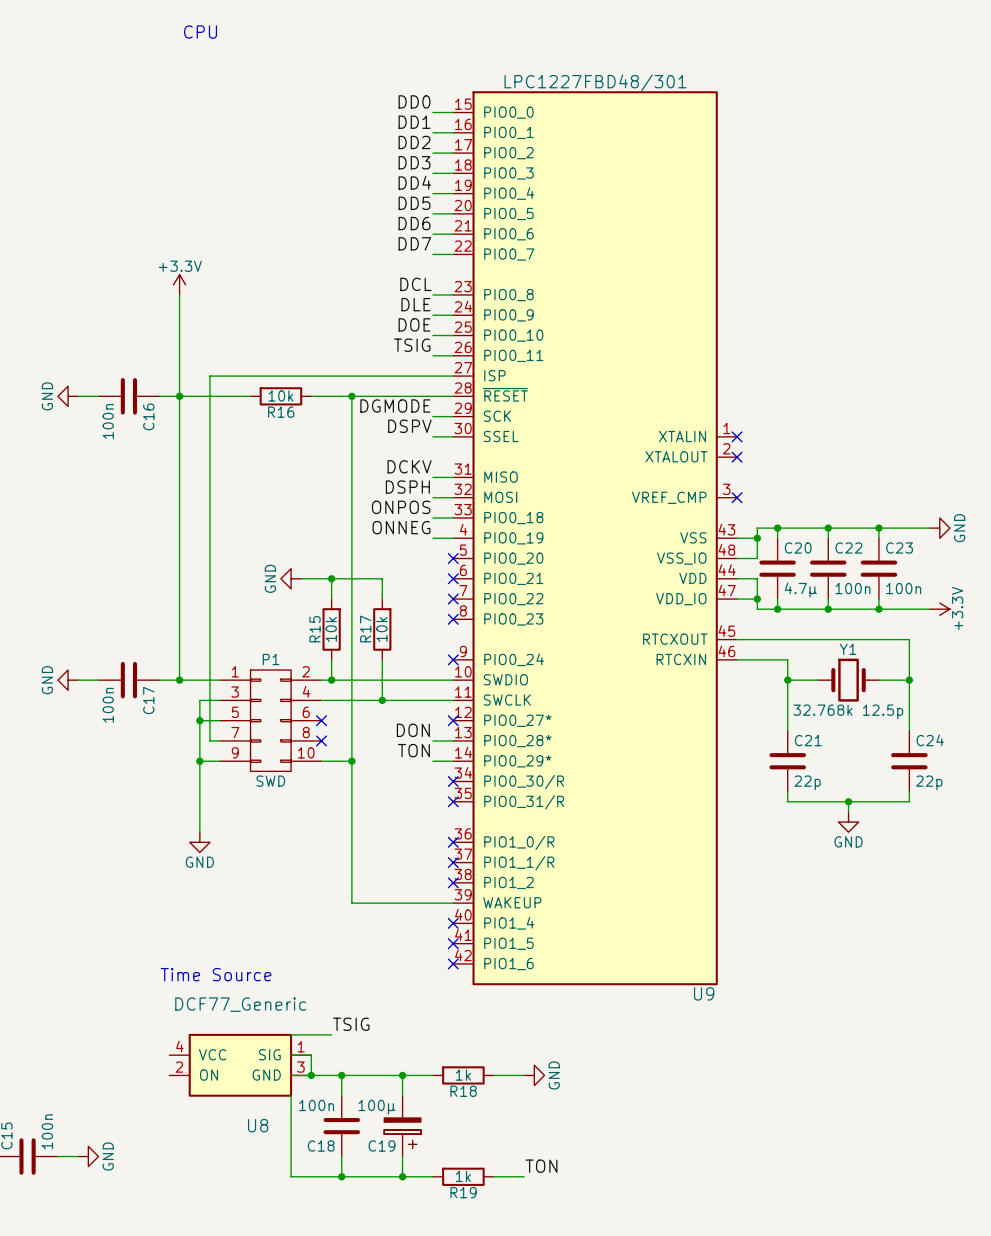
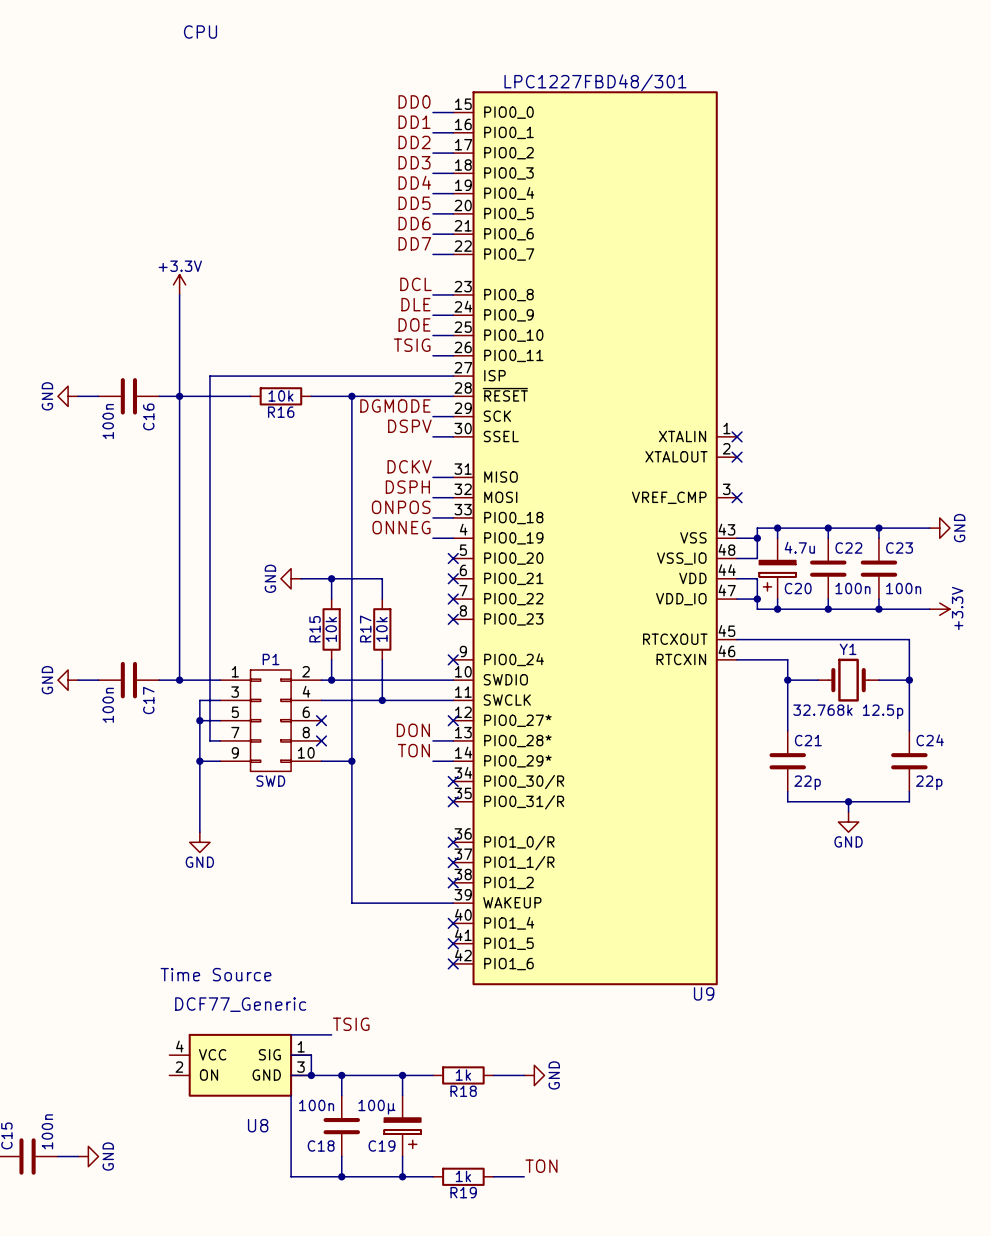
C20 symbol: [759, 538, 796, 600] -> [759, 538, 796, 600]
C20 name position: C20 (798, 548) -> C20 (798, 588)
C20 value: 4.7µ (800, 589) -> 4.7u (799, 547)

